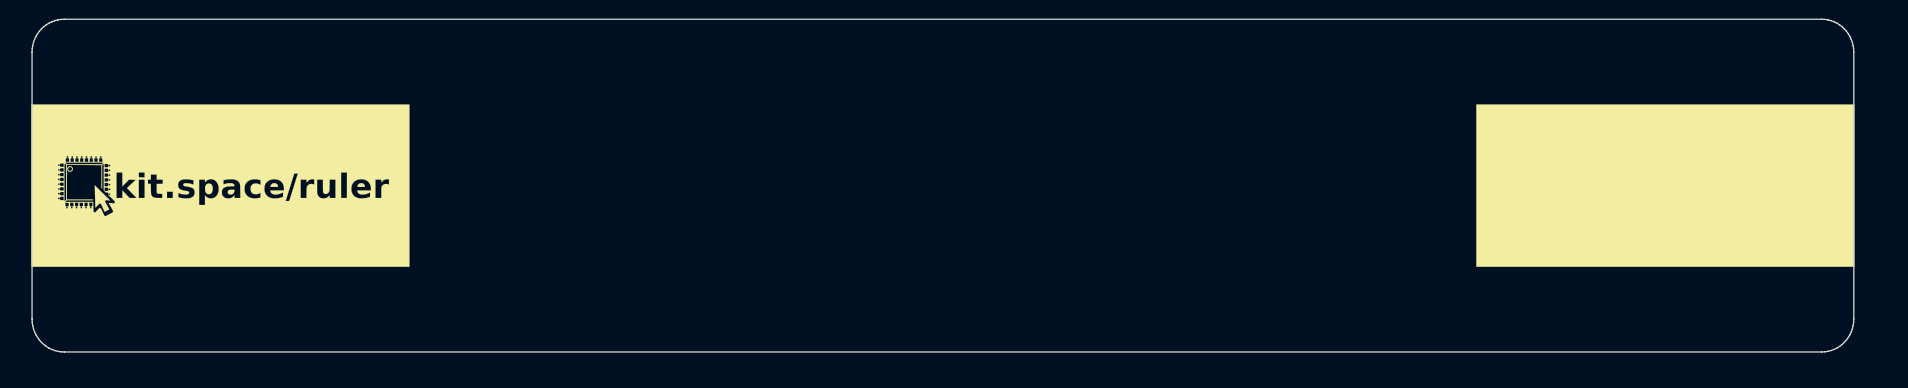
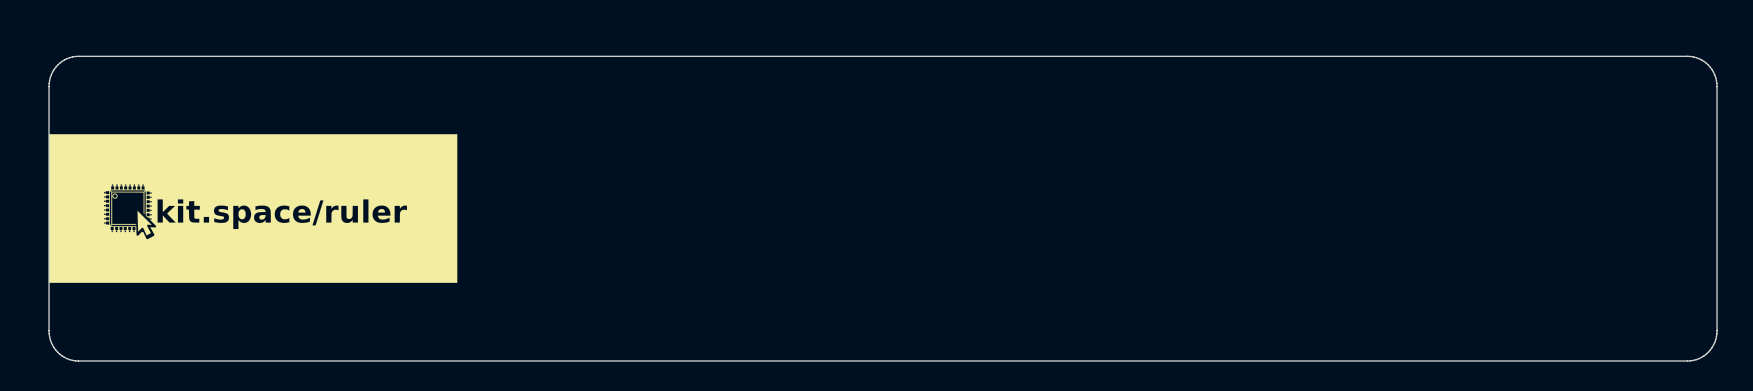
drawing: [31, 104, 1855, 267] -> none
drawing: none -> [48, 134, 458, 283]

